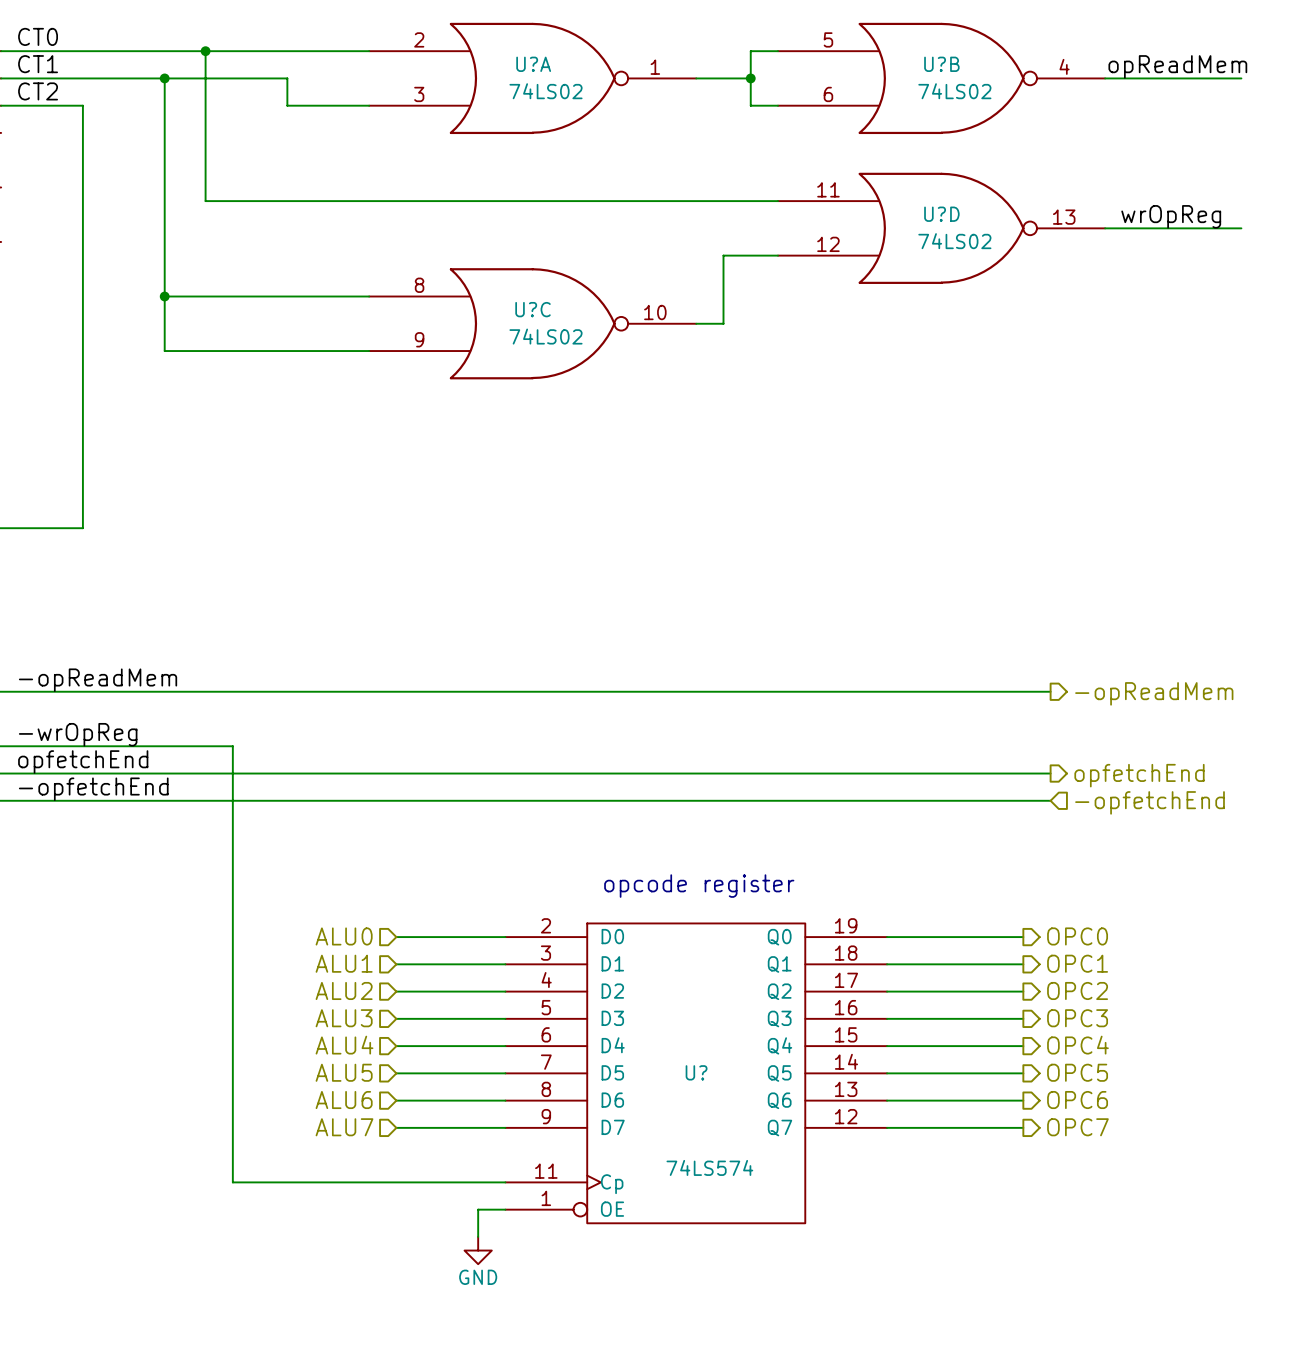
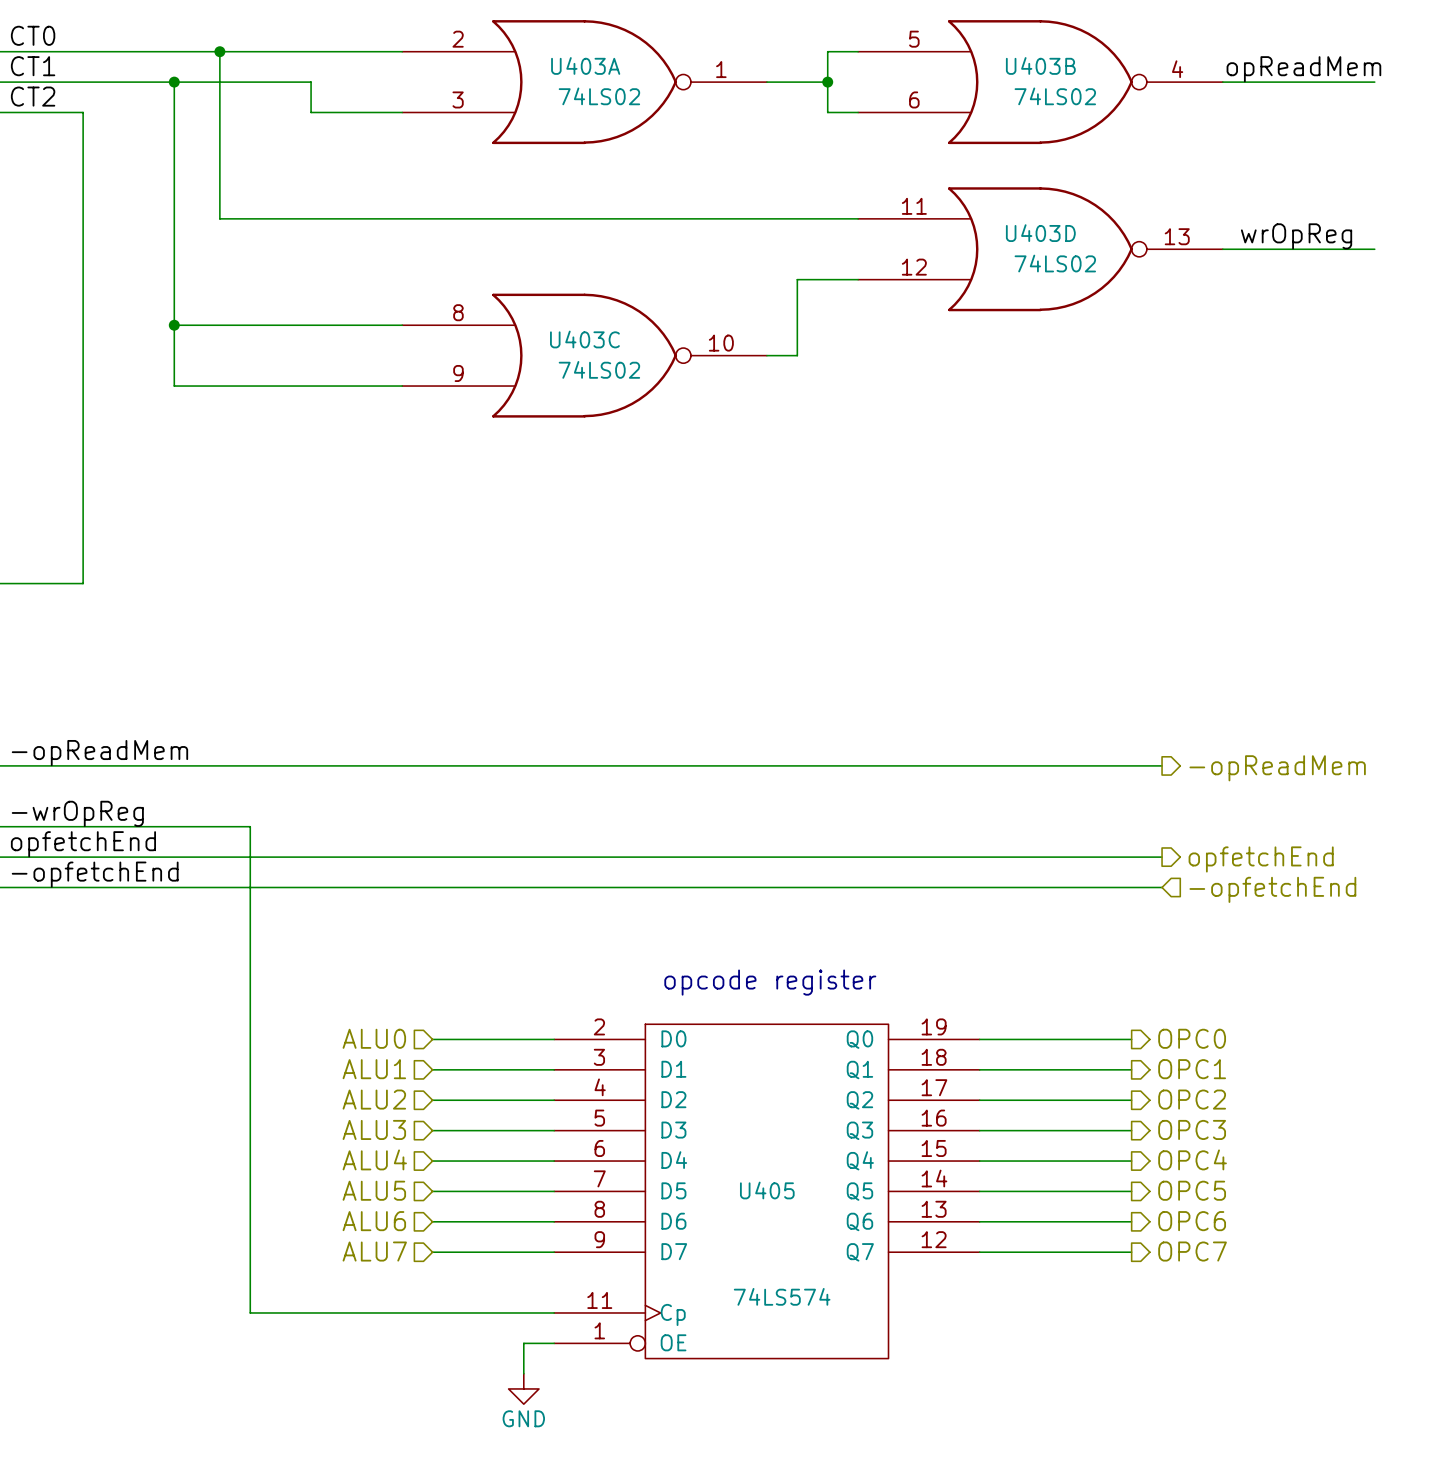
U?A name: U?A (533, 64) -> U403A (585, 65)
U?B name: U?B (941, 64) -> U403B (1040, 65)
U?D name: U?D (941, 214) -> U403D (1040, 233)
U?C name: U?C (533, 309) -> U403C (584, 339)
U? name: U? (696, 1072) -> U405 (767, 1190)

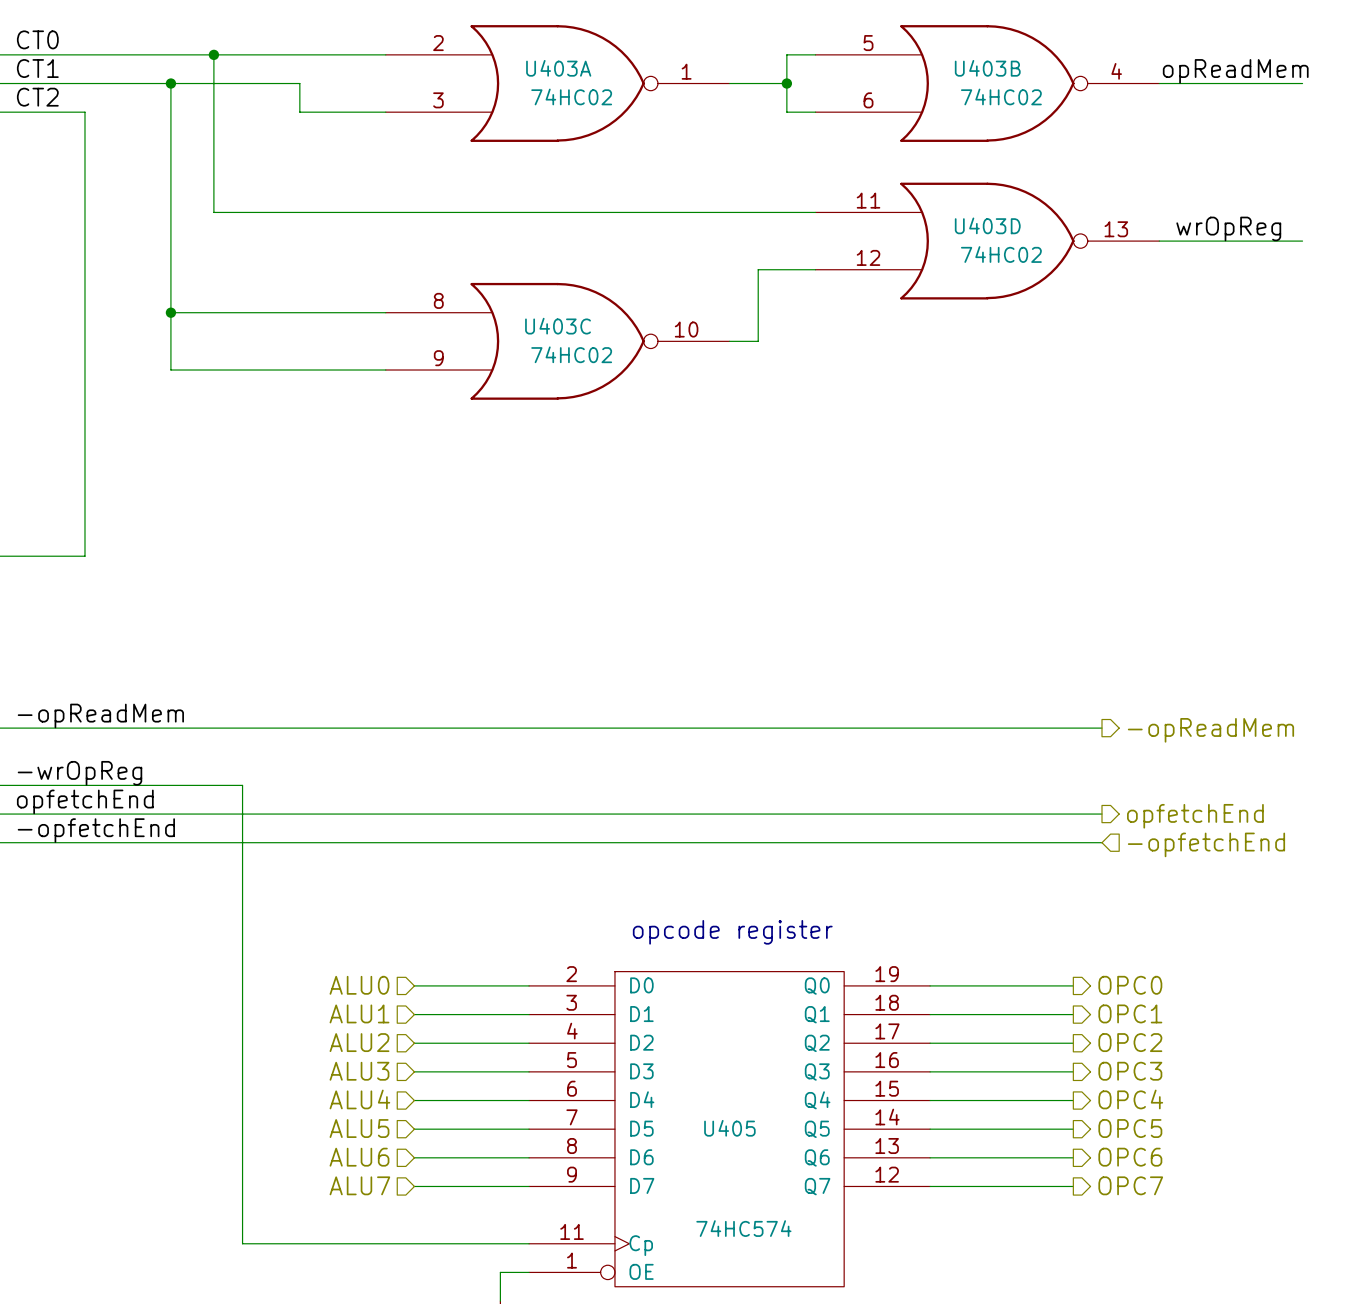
U403A value: 74LS02 (599, 96) -> 74HC02 (571, 96)
U403B value: 74LS02 (1055, 96) -> 74HC02 (1001, 96)
U403D value: 74LS02 (1055, 263) -> 74HC02 (1001, 254)
U403C value: 74LS02 (599, 369) -> 74HC02 (571, 354)
U405 value: 74LS574 (782, 1296) -> 74HC574 (743, 1228)

